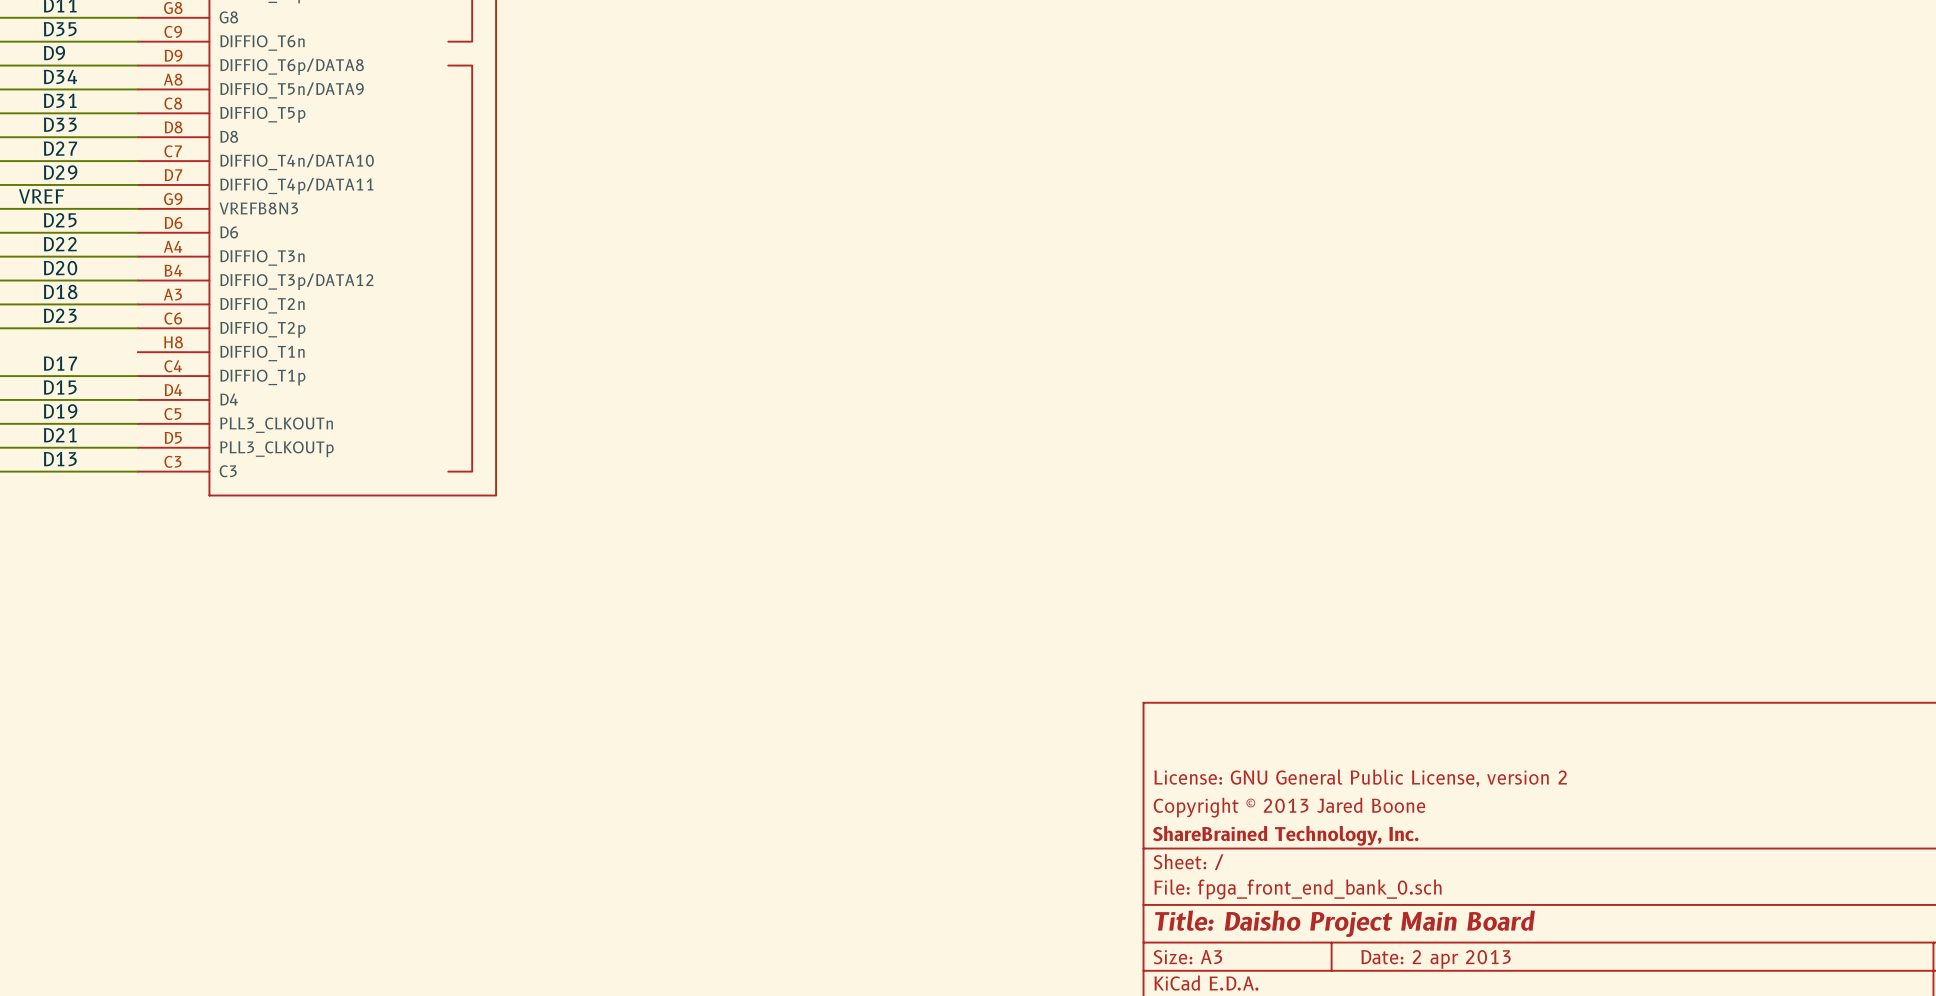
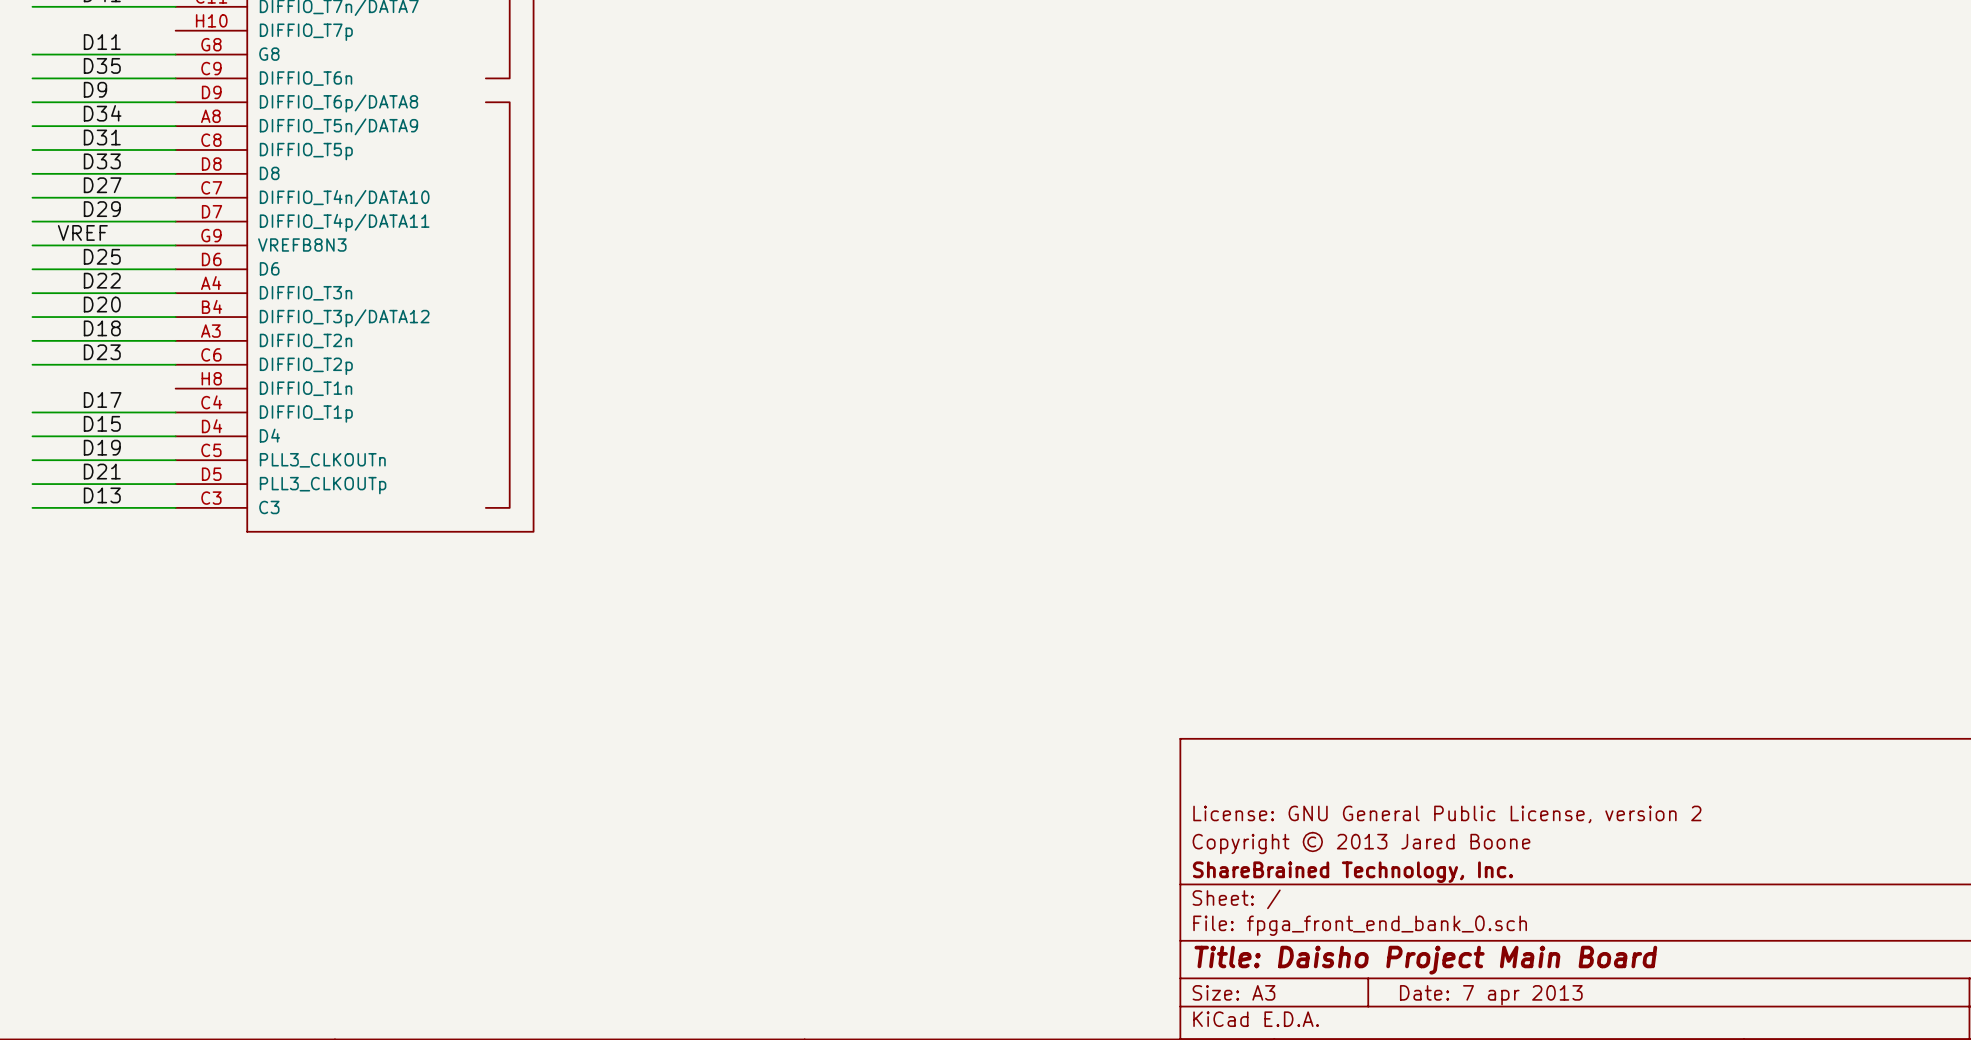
title block: Date: 2 apr 2013 (1436, 959) -> Date: 7 apr 2013 (1491, 995)

